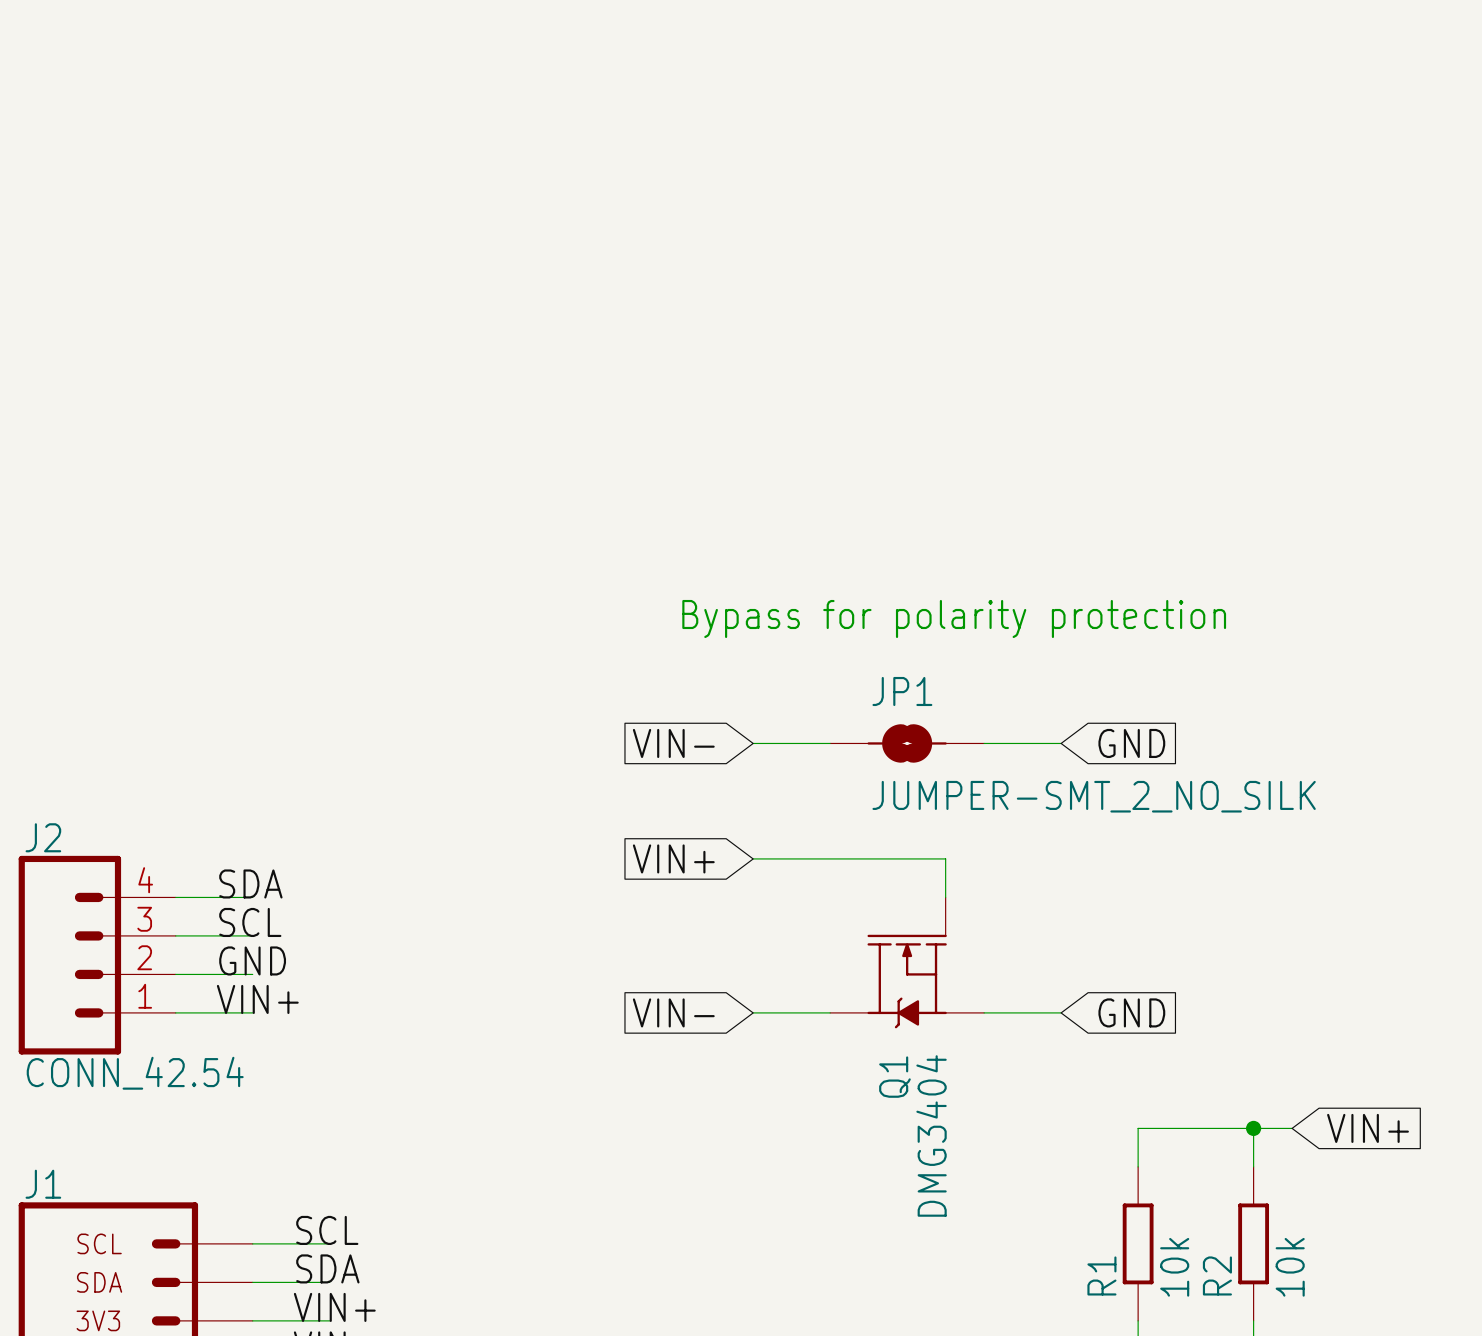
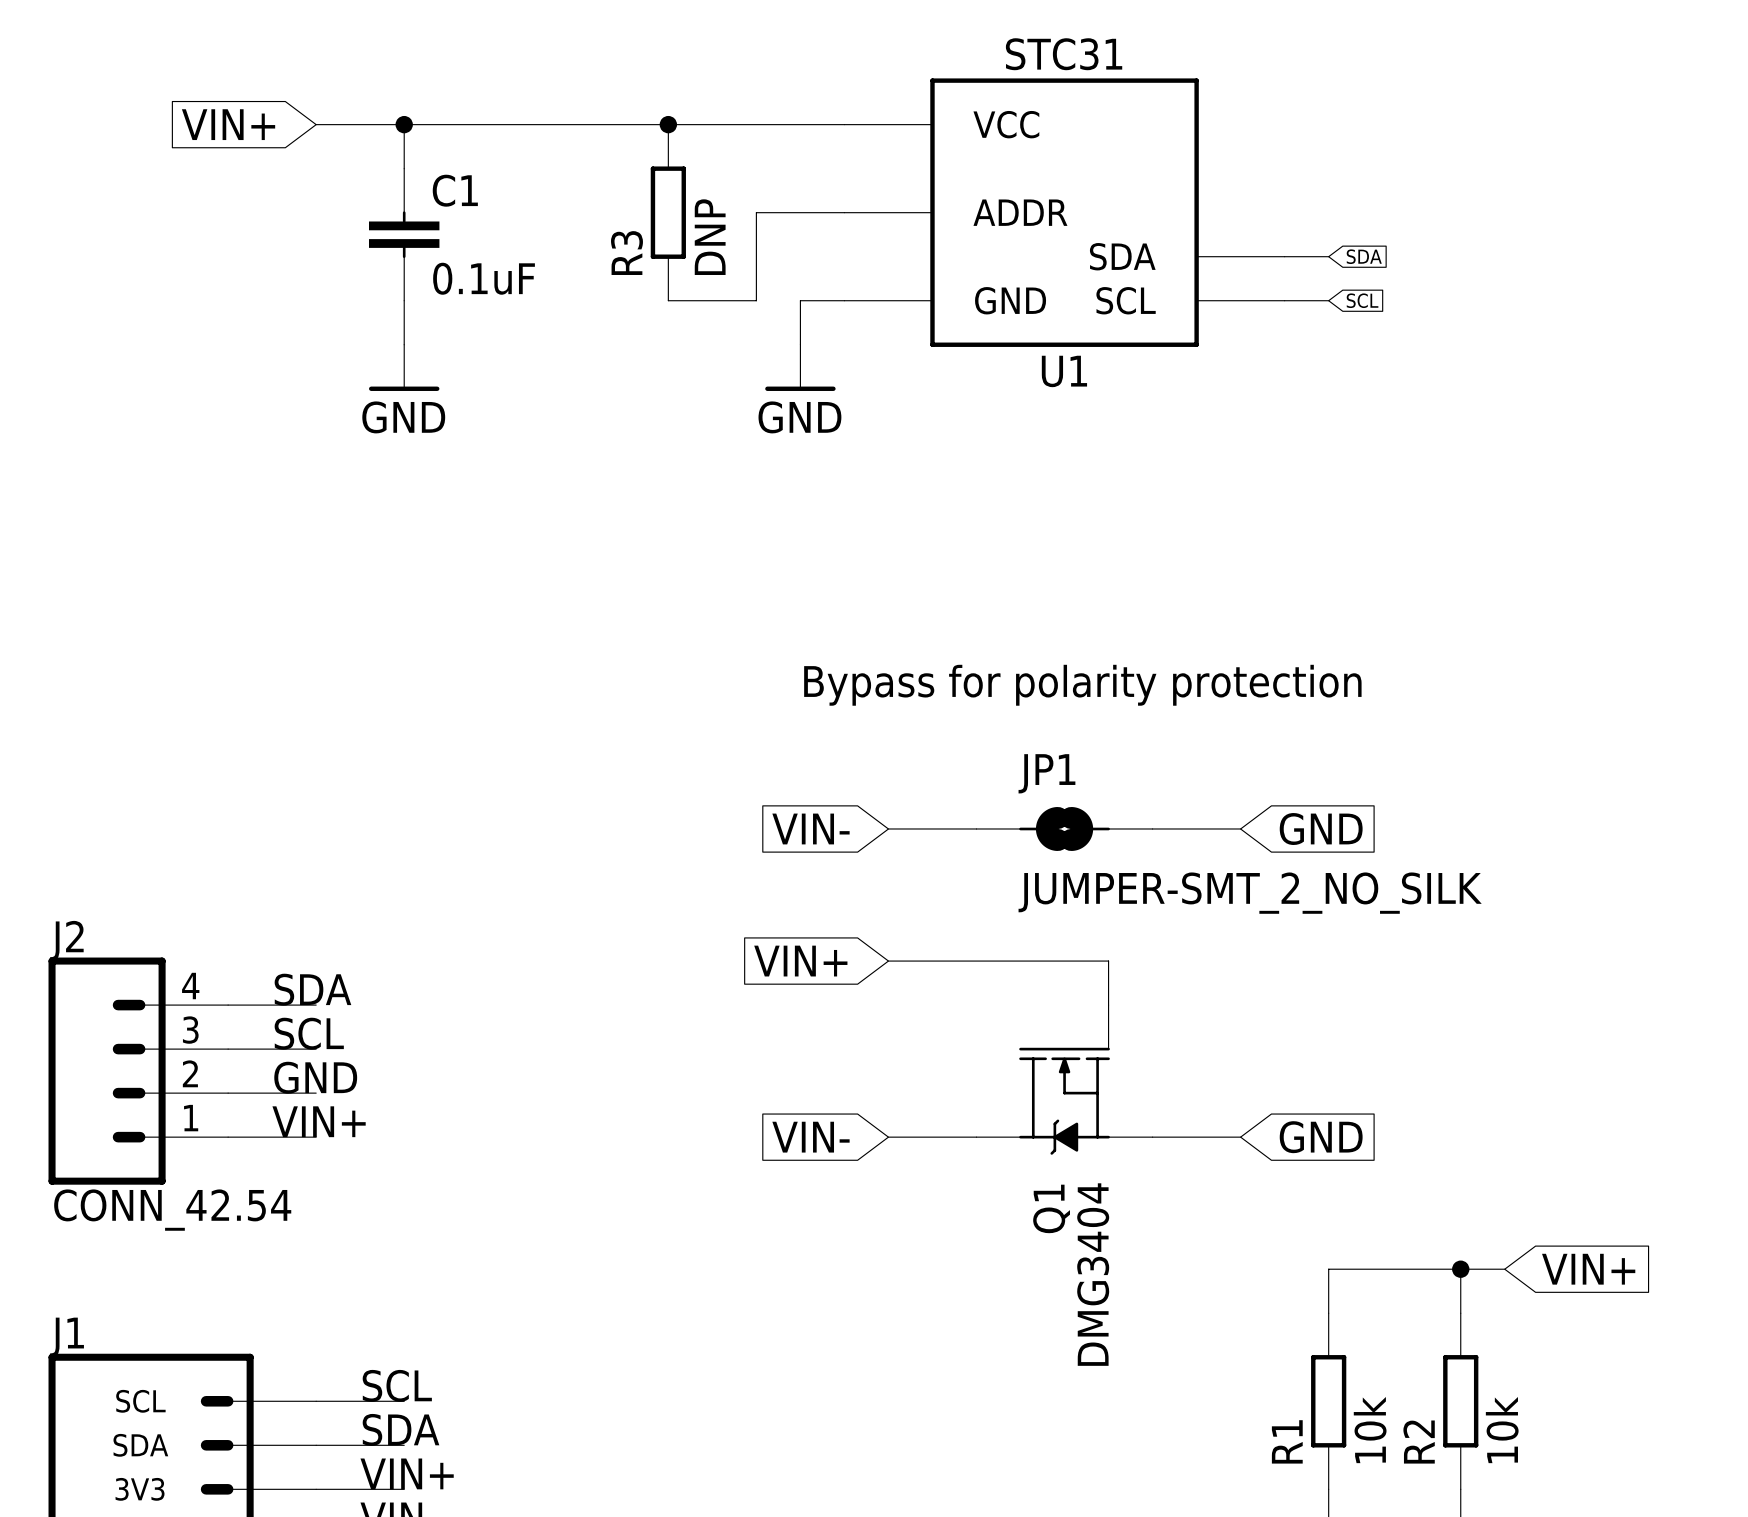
global label: none -> VIN+ (228, 124)
wire: none -> (316, 124) (844, 124)
wire: none -> (404, 124) (404, 168)
junction: none -> (404, 124)
junction: none -> (668, 124)
R3: none -> DNP (668, 212)
wire: none -> (844, 212) (756, 212) (756, 300) (668, 300)
U1: none -> (1064, 212)
C1: none -> 0.1uF (404, 234)
wire: none -> (1284, 256) (1328, 256)
global label: none -> SDA (1364, 256)
wire: none -> (404, 300) (404, 344)
wire: none -> (844, 300) (800, 300) (800, 344)
wire: none -> (1284, 300) (1328, 300)
global label: none -> SCL (1362, 300)
power symbol: none -> GND (404, 367)
power symbol: none -> GND (800, 367)

